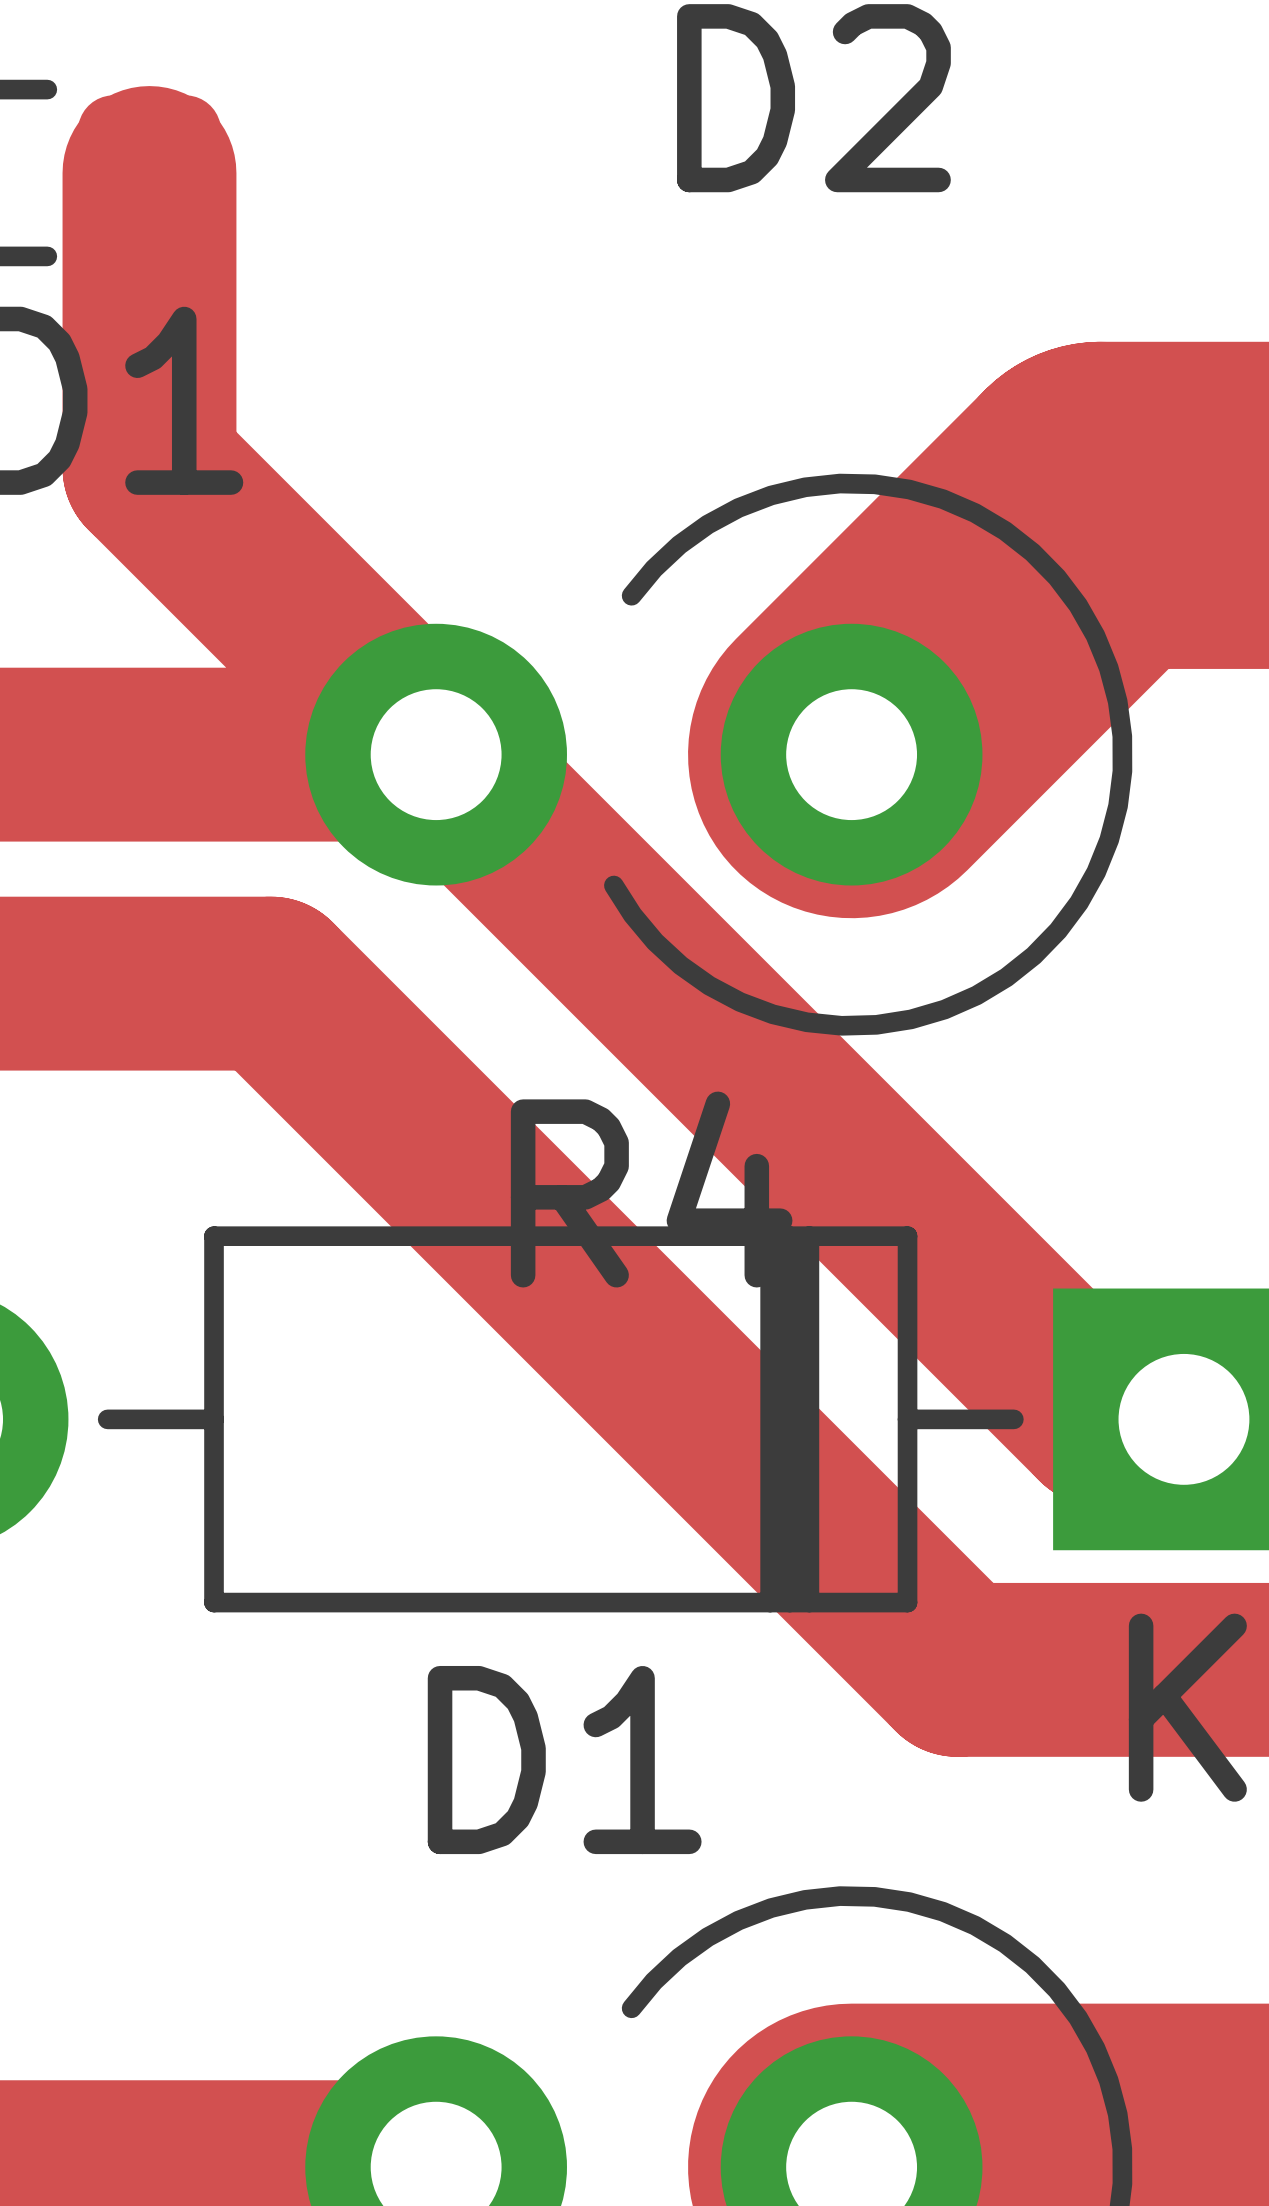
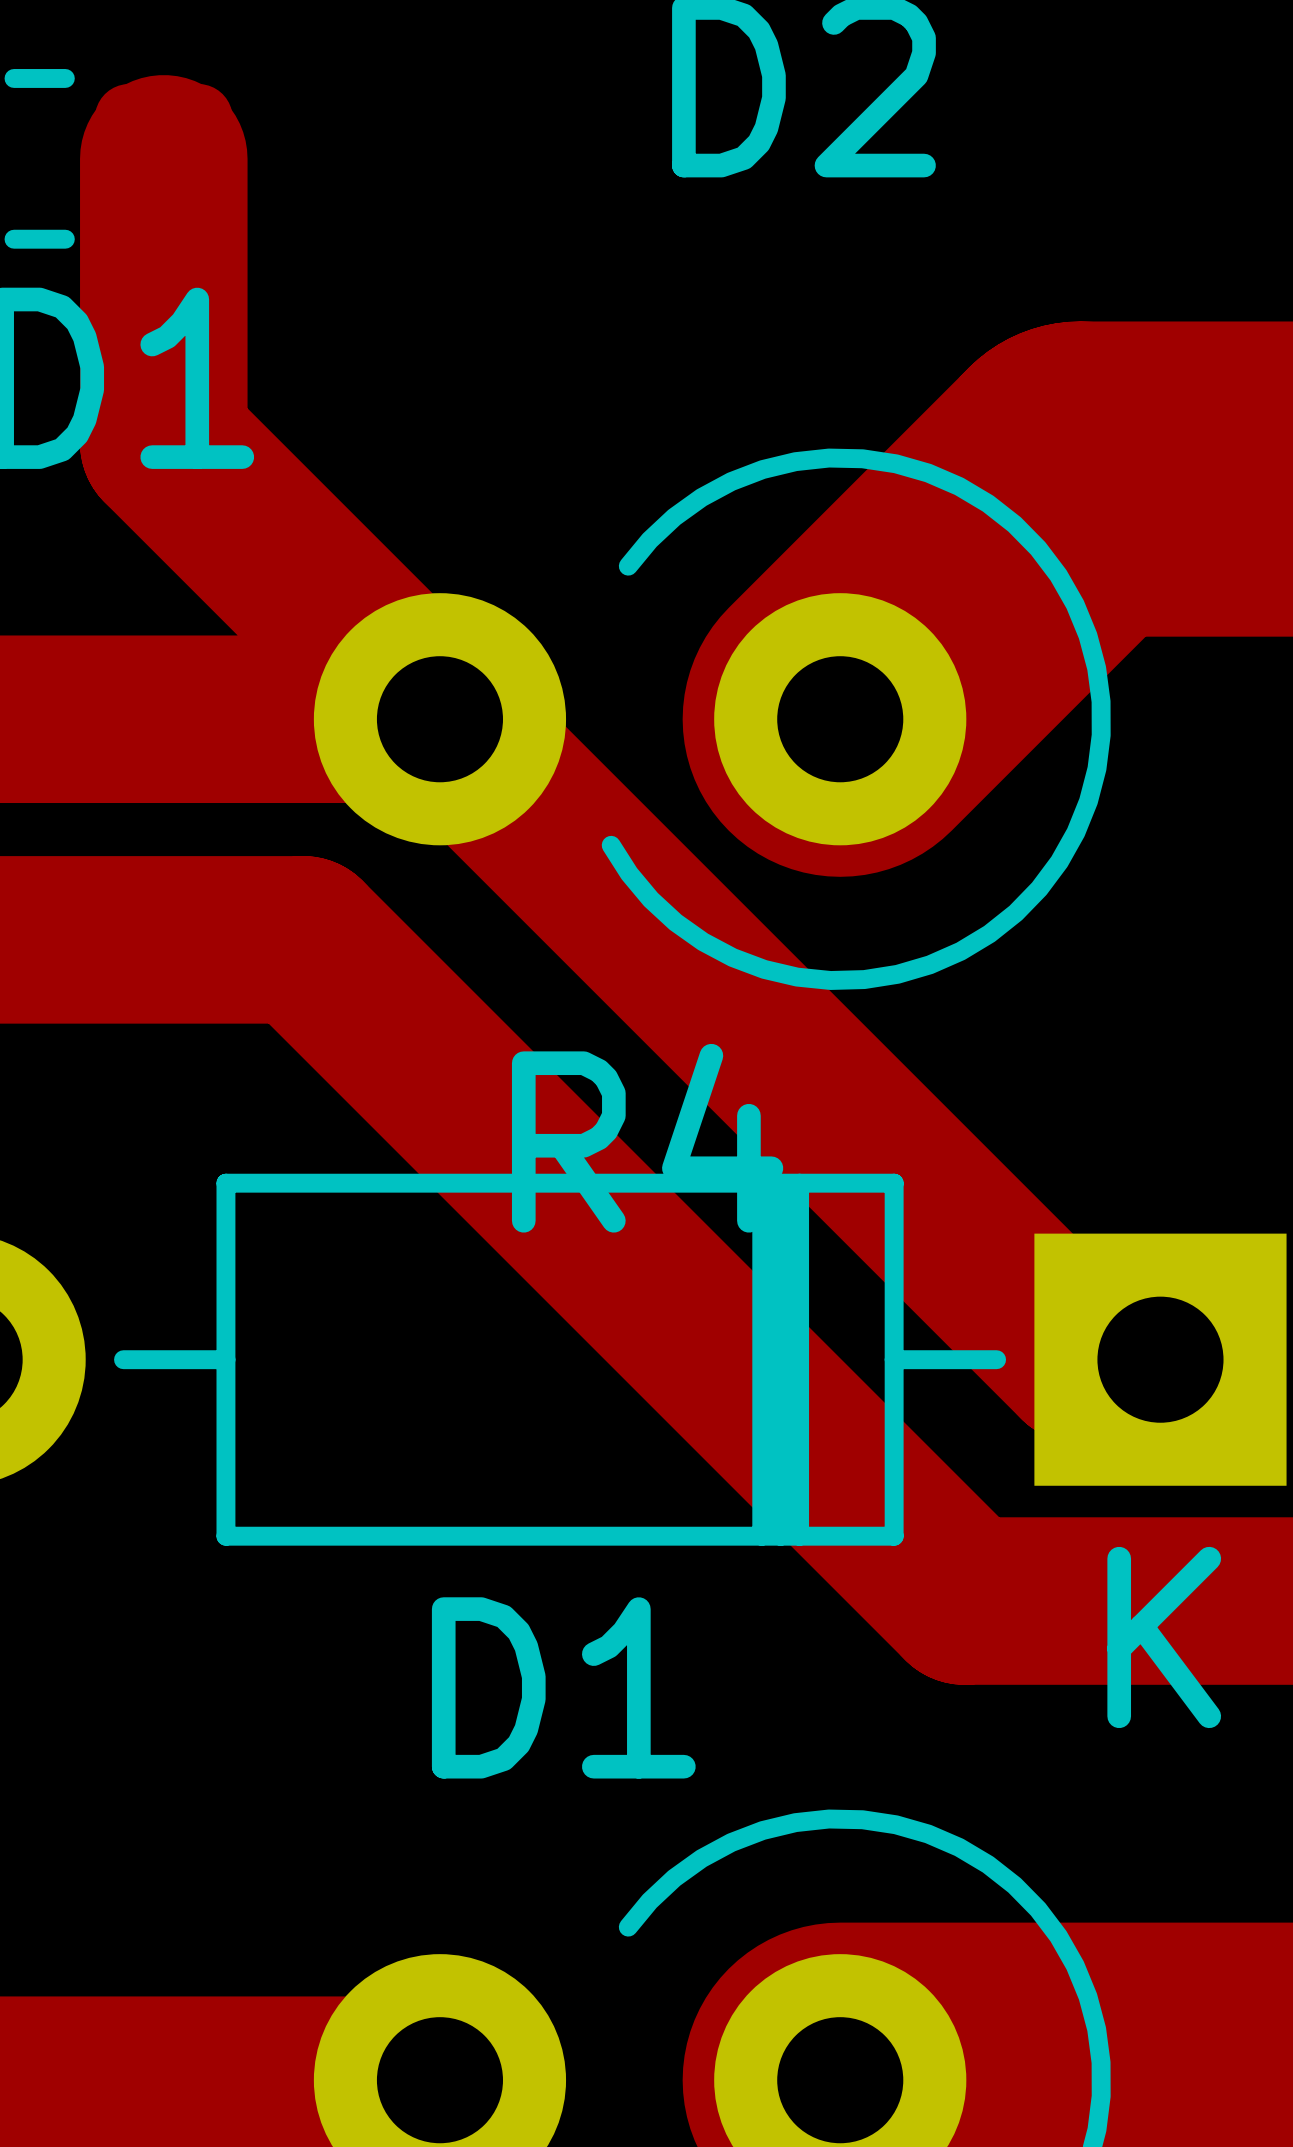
track: (271, 983) (957, 1669) (980, 1669) -> (280, 939) (303, 939) (964, 1601)

